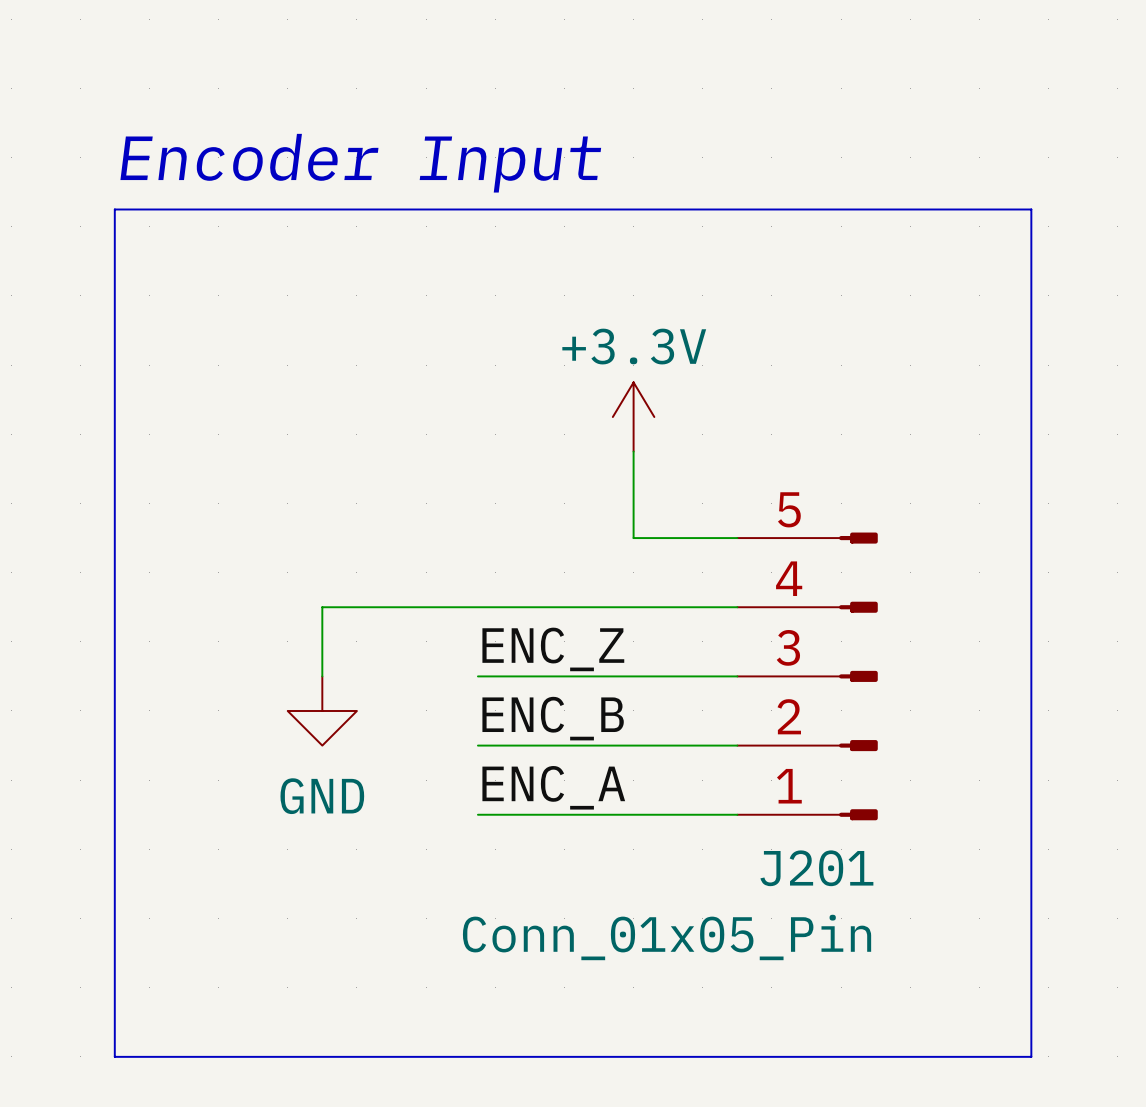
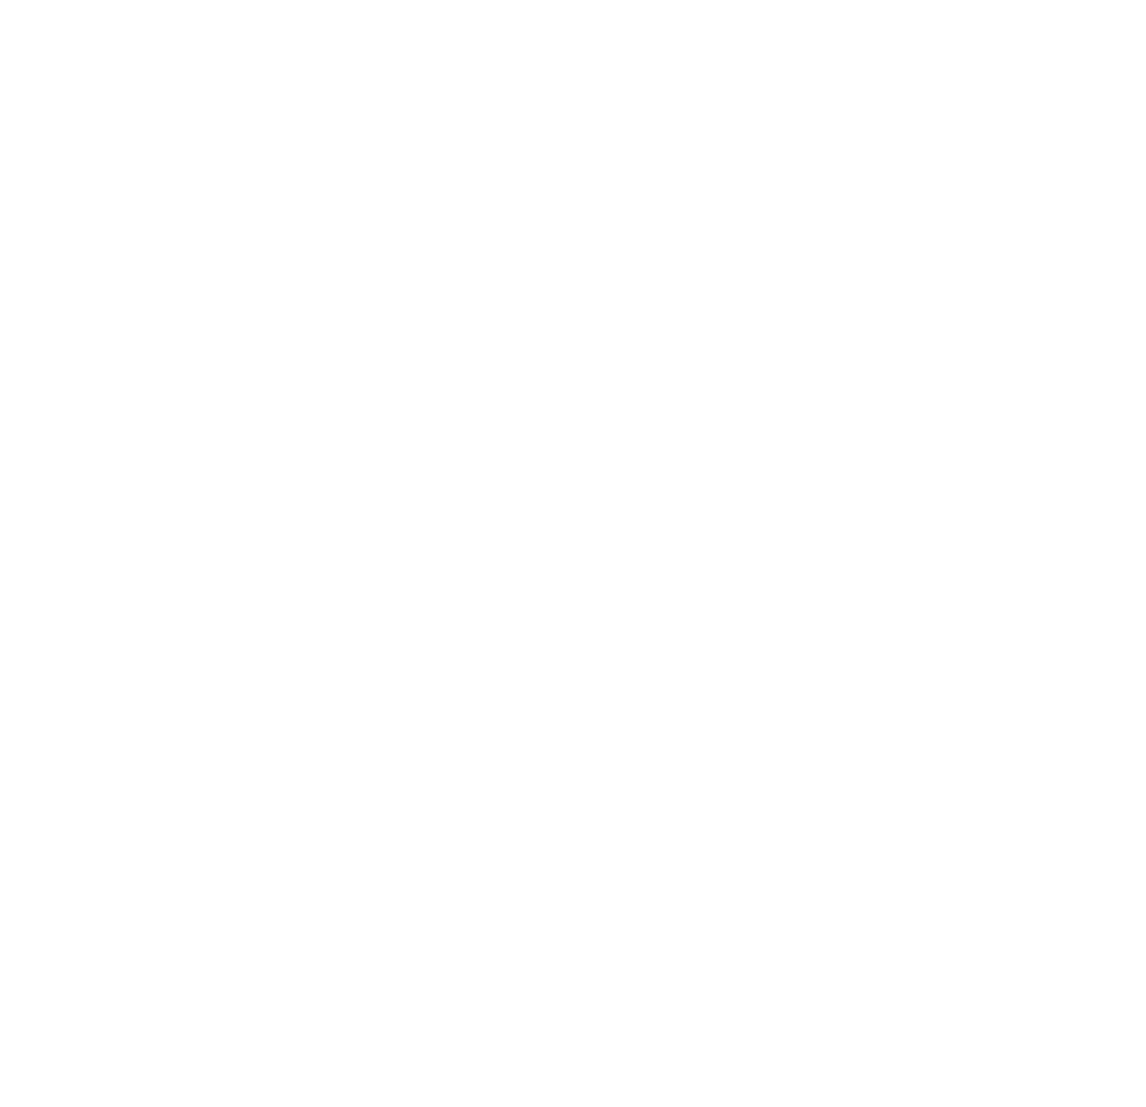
text: Encoder Input (360, 163) -> none
line: (114, 209) (1031, 209) (1031, 1056) (114, 1056) (114, 209) -> none
power symbol: +3.3V (633, 417) -> none
wire: (633, 451) (633, 538) (737, 538) -> none
wire: (737, 607) (322, 607) (322, 676) -> none
label: ENC_Z (553, 649) -> none
wire: (477, 676) (737, 676) -> none
J201: Conn_01x05_Pin (807, 676) -> none
power symbol: GND (322, 710) -> none
label: ENC_B (553, 718) -> none
wire: (477, 745) (737, 745) -> none
label: ENC_A (553, 787) -> none
wire: (477, 814) (737, 814) -> none

